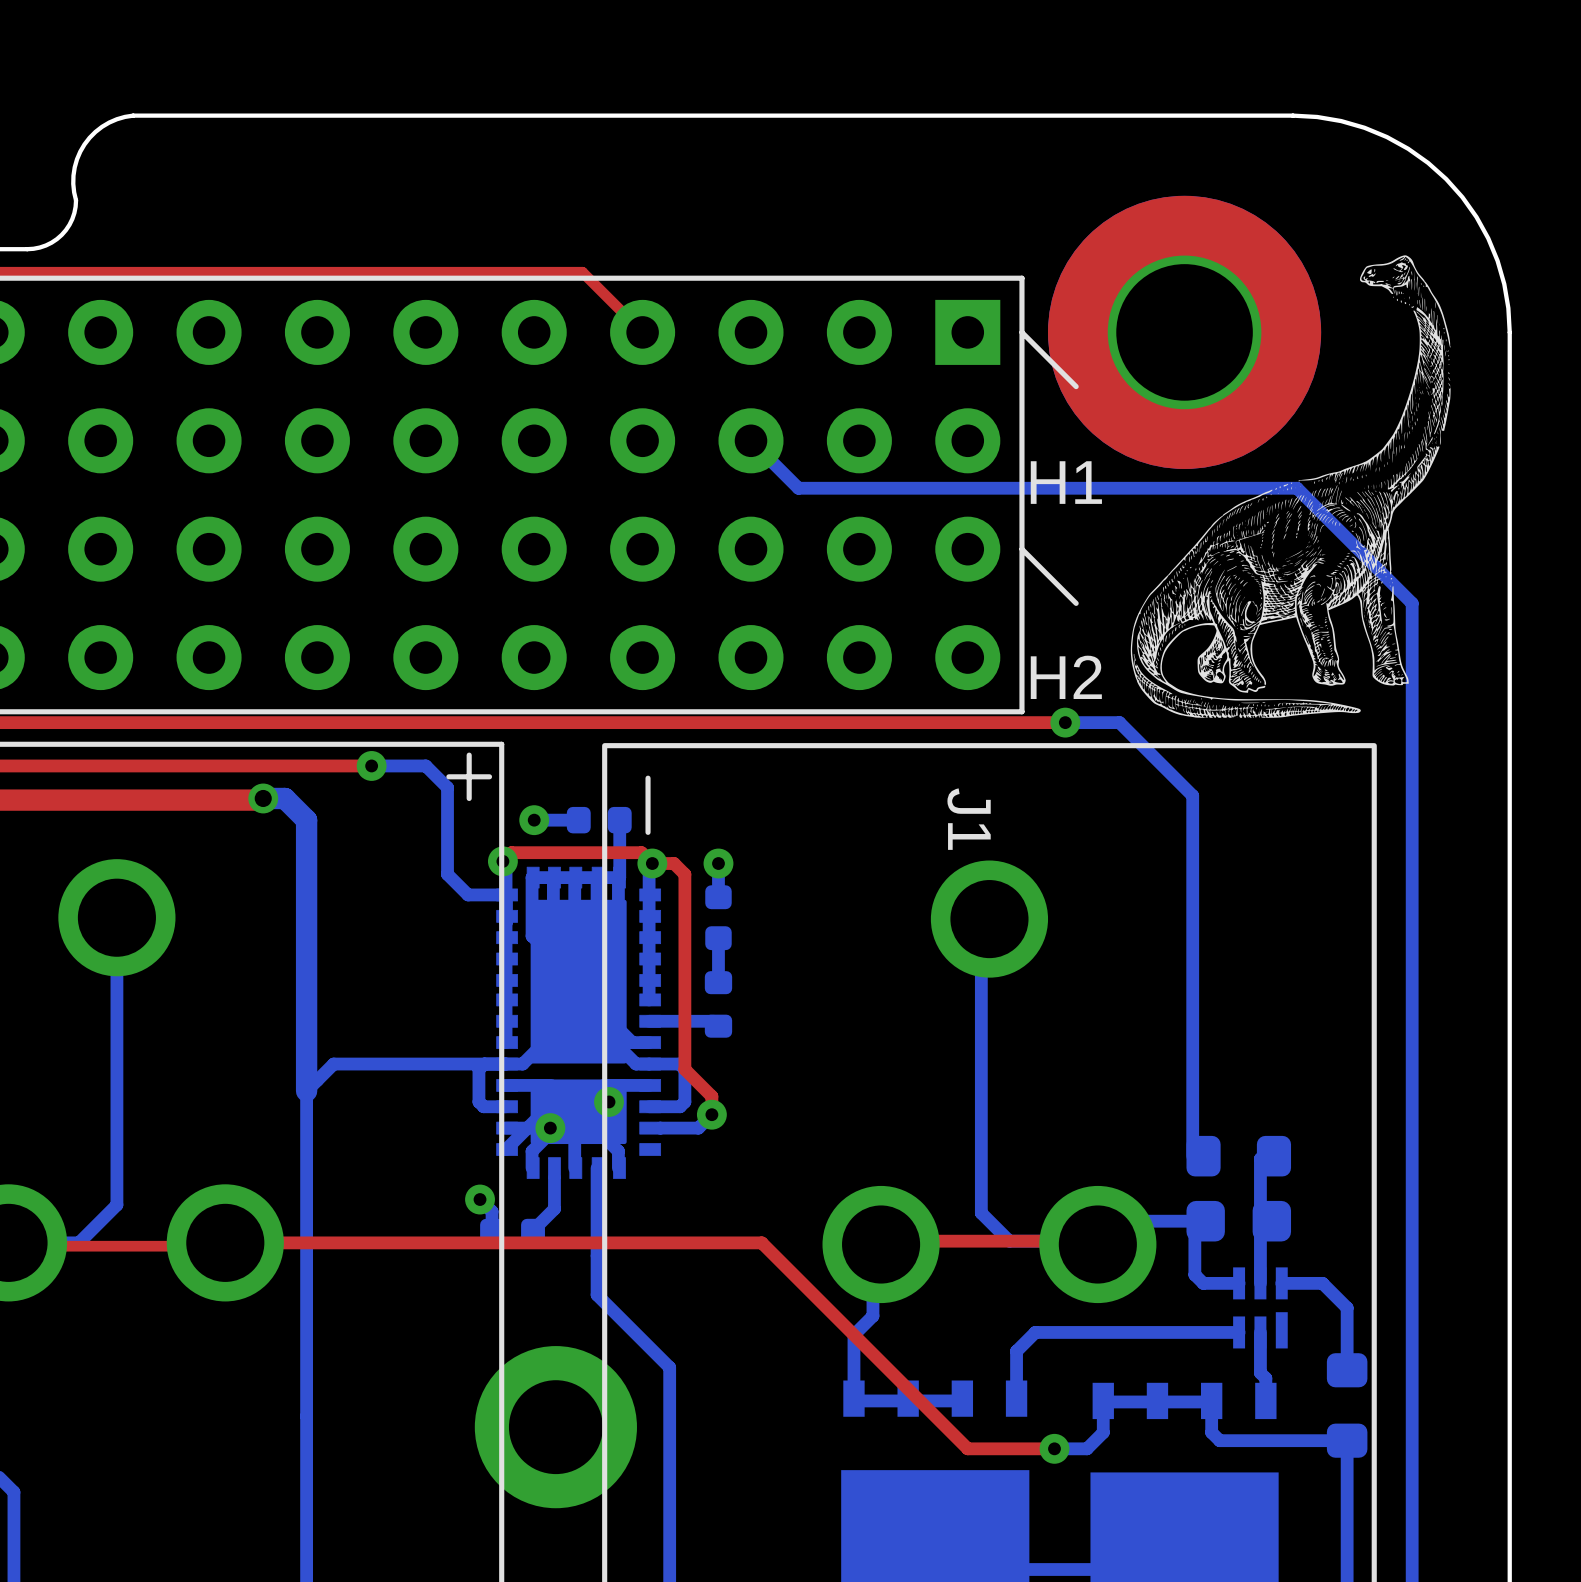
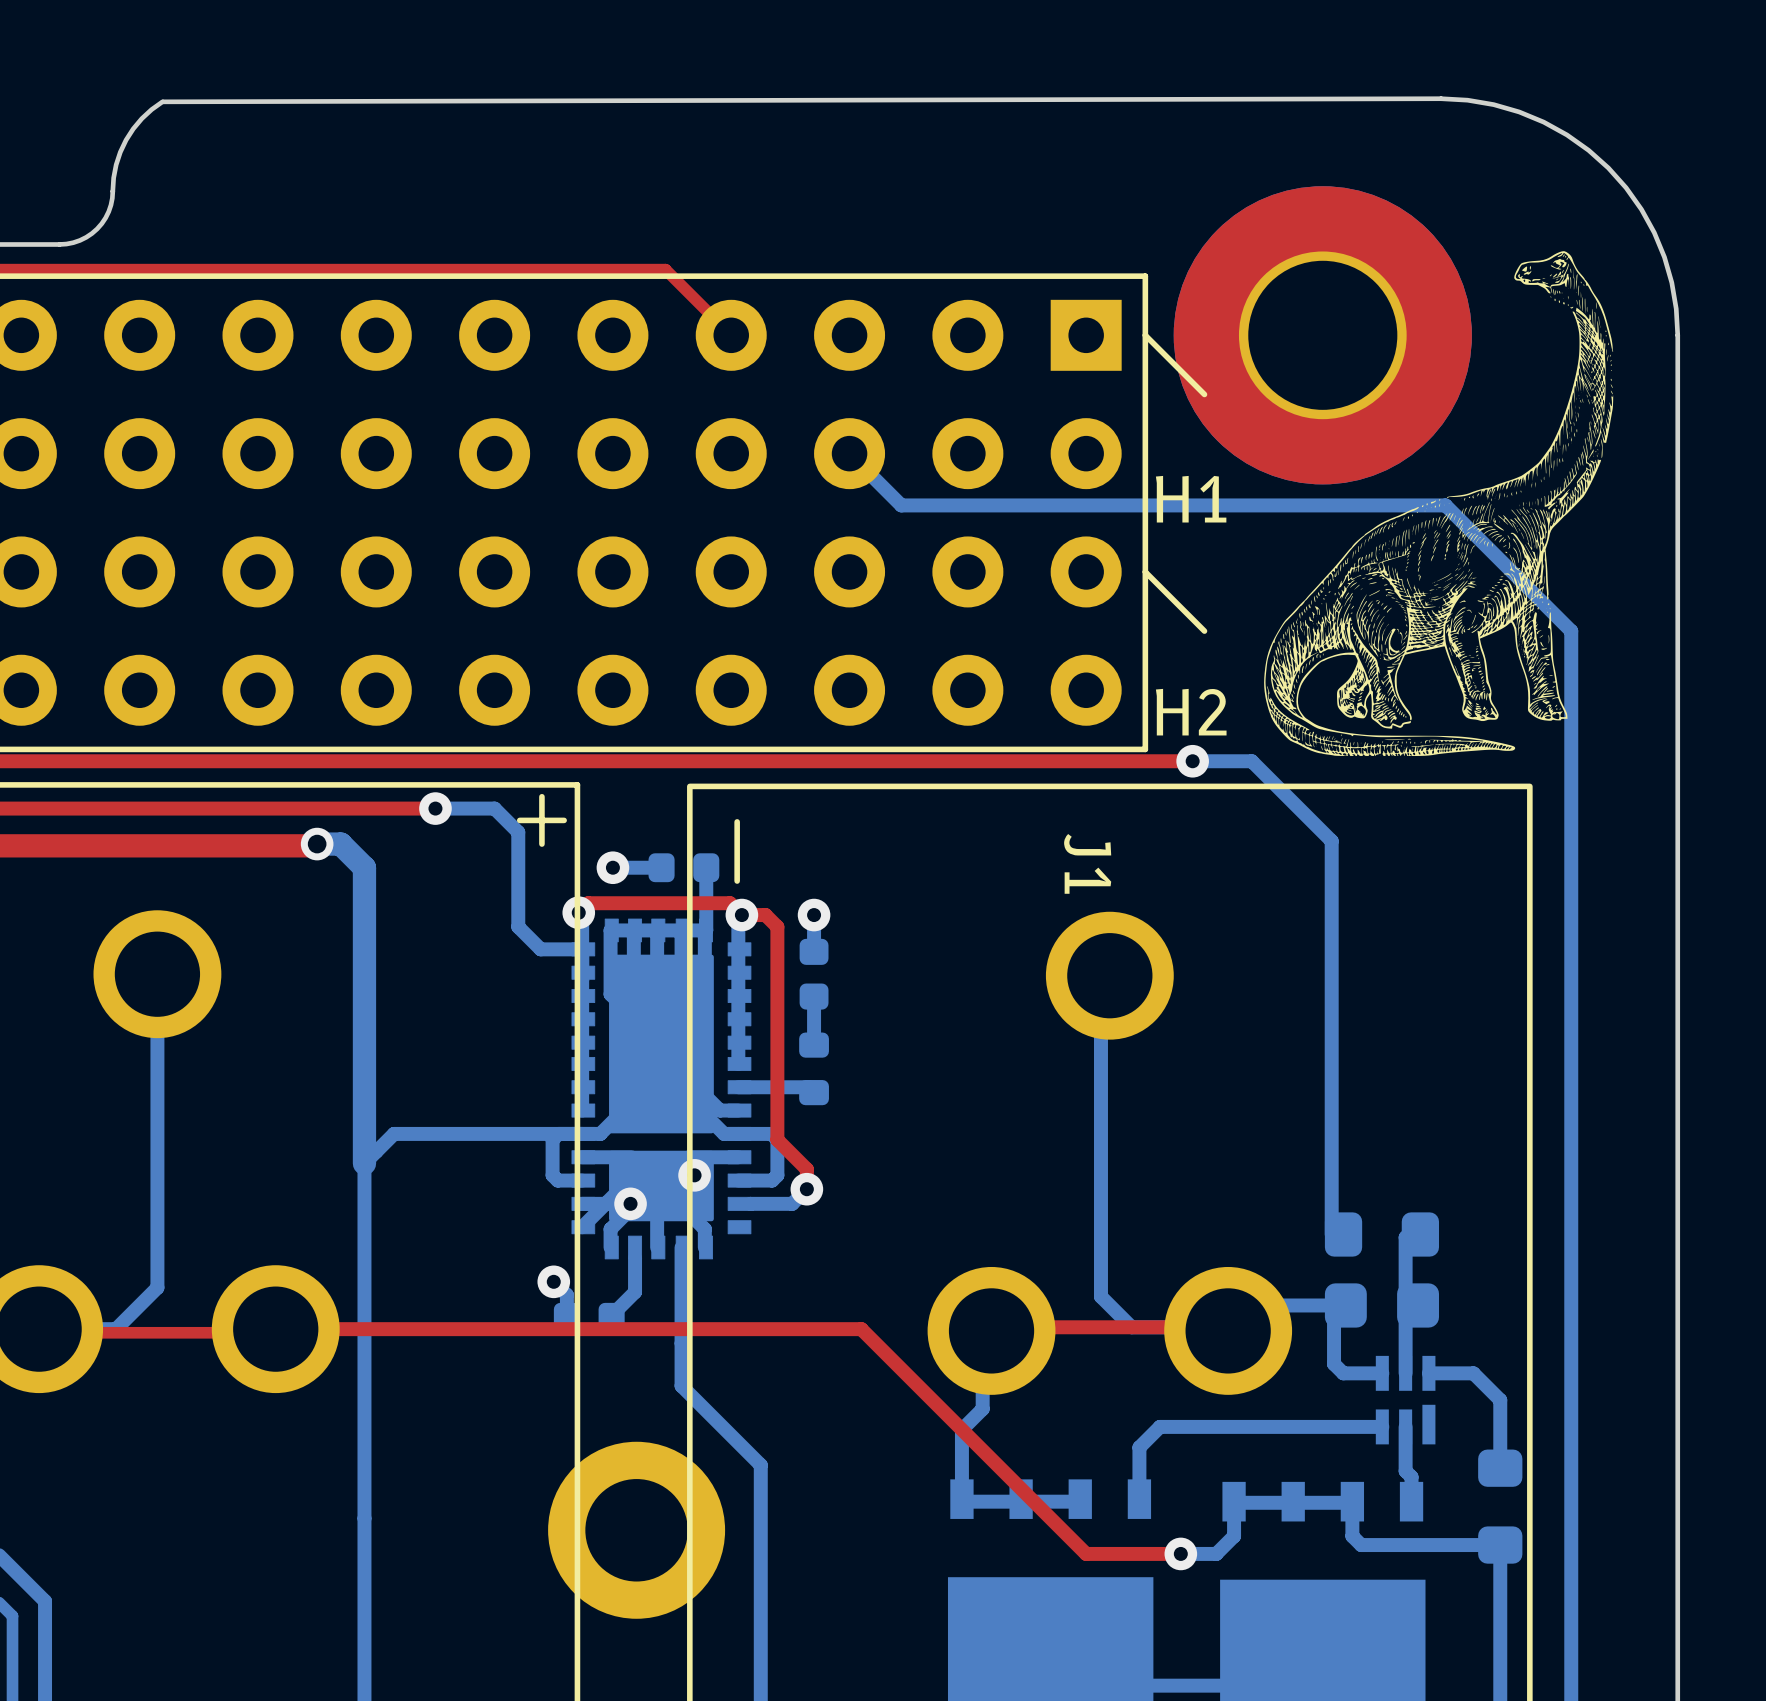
board edge: (1292, 115) (133, 115) (116, 119) (102, 126) (84, 144) (74, 167) (73, 183) (76, 200) -> (1441, 98) (163, 101)
board edge: none -> (162, 101) (141, 118) (126, 140) (116, 164) (112, 191)

